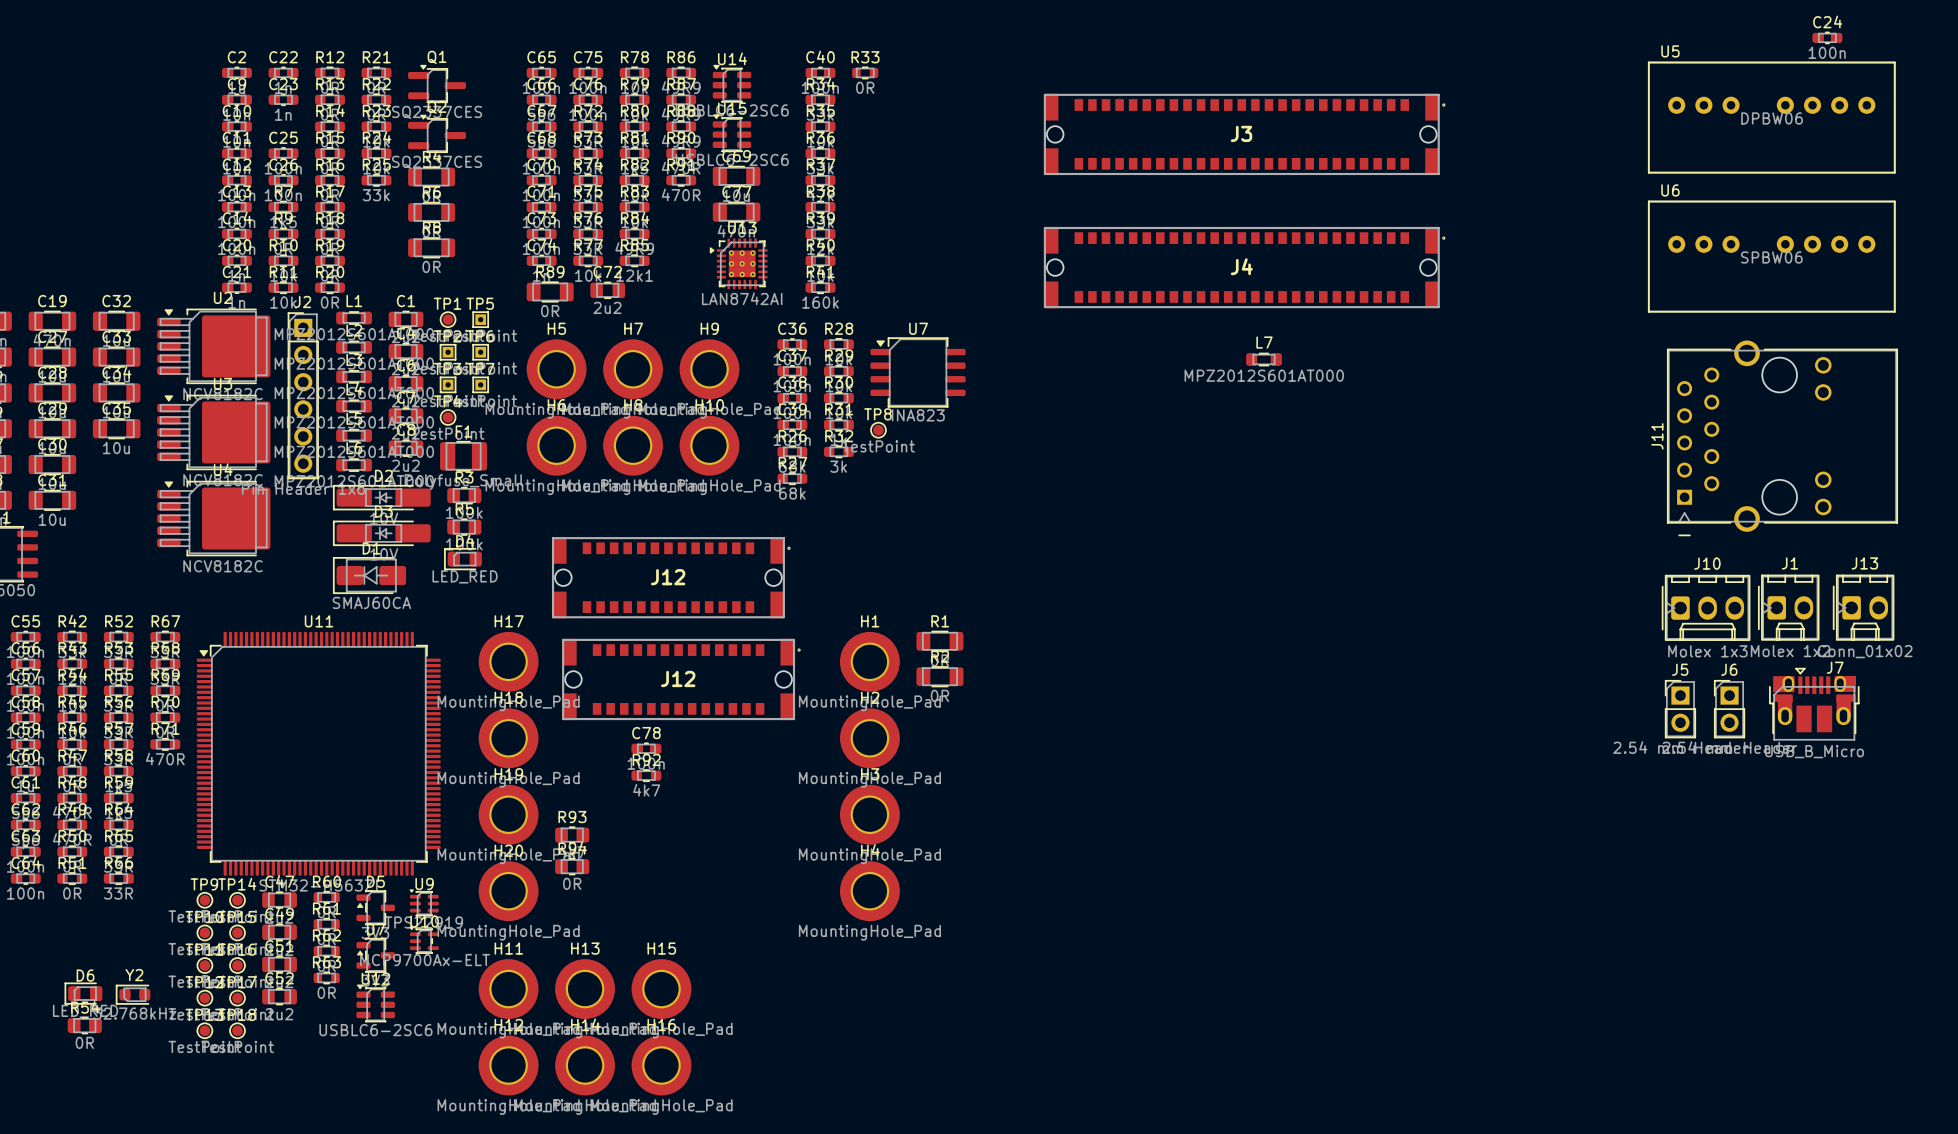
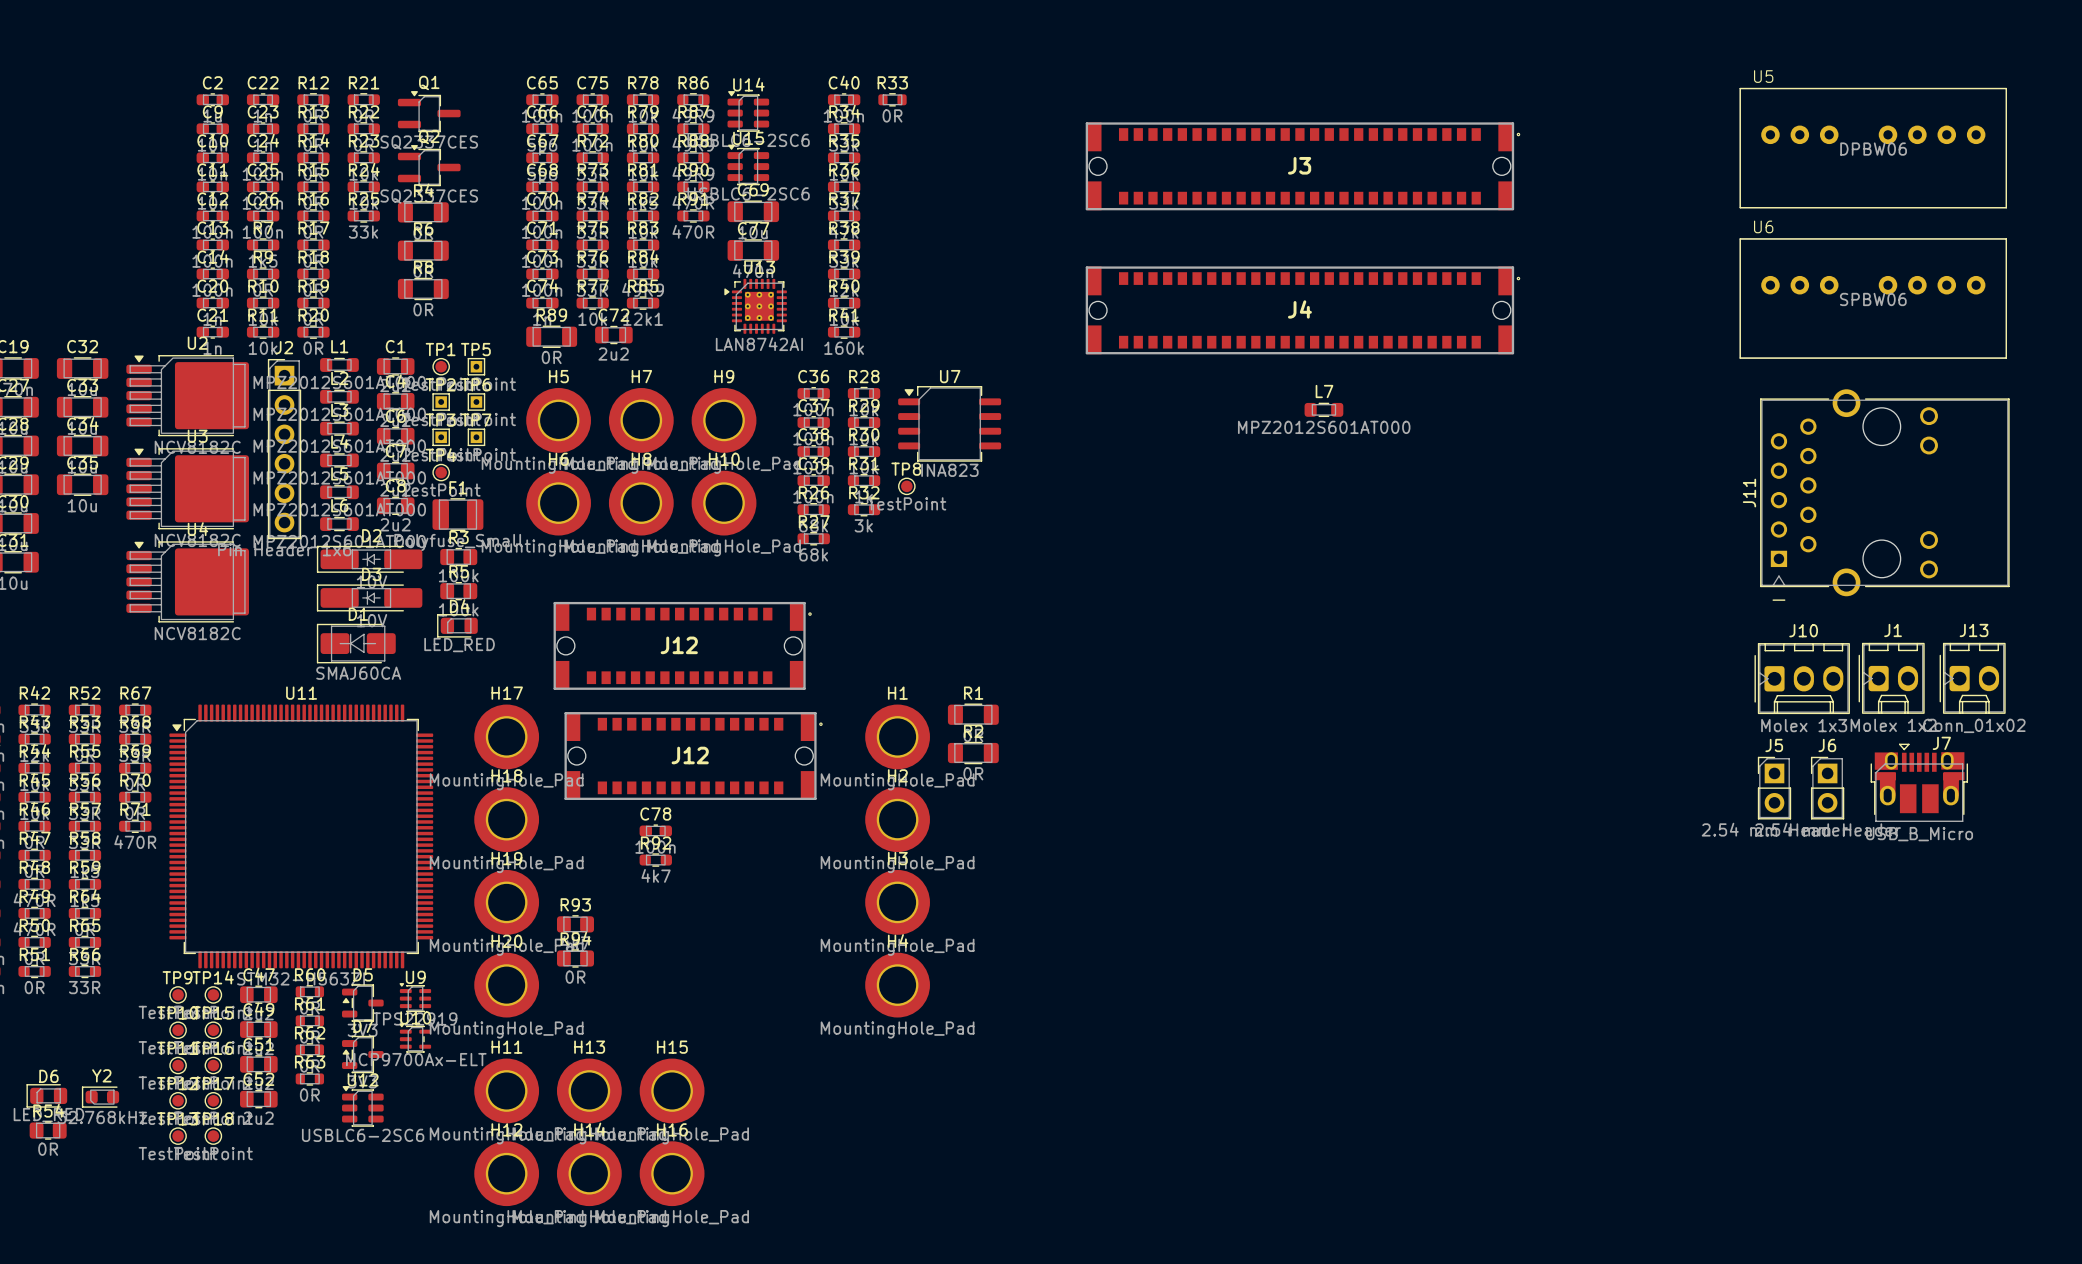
C24 position: (1827, 37) -> (263, 157)

